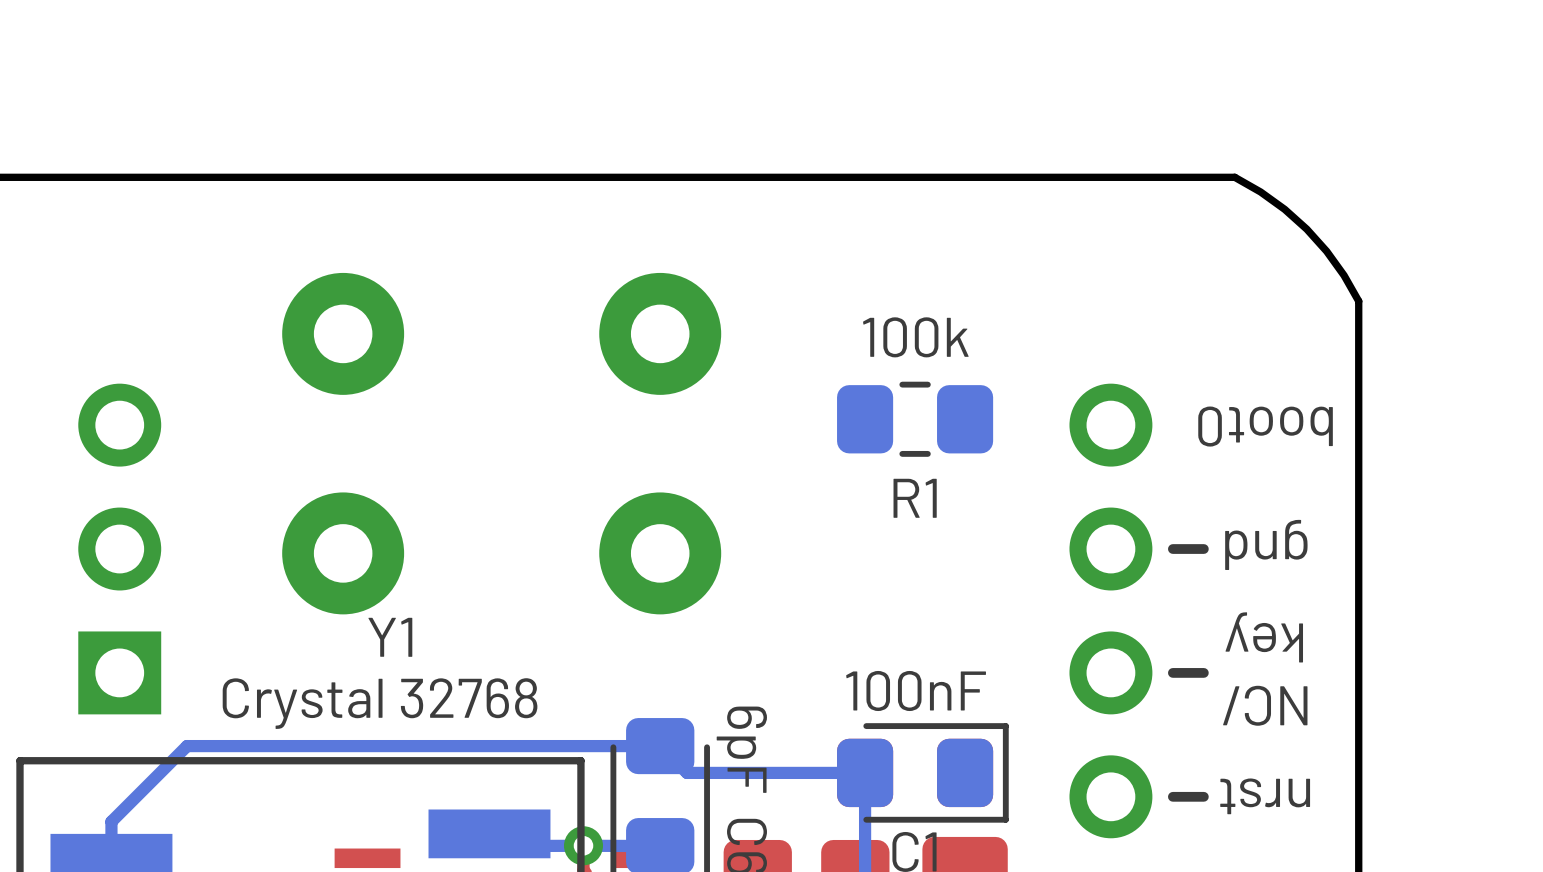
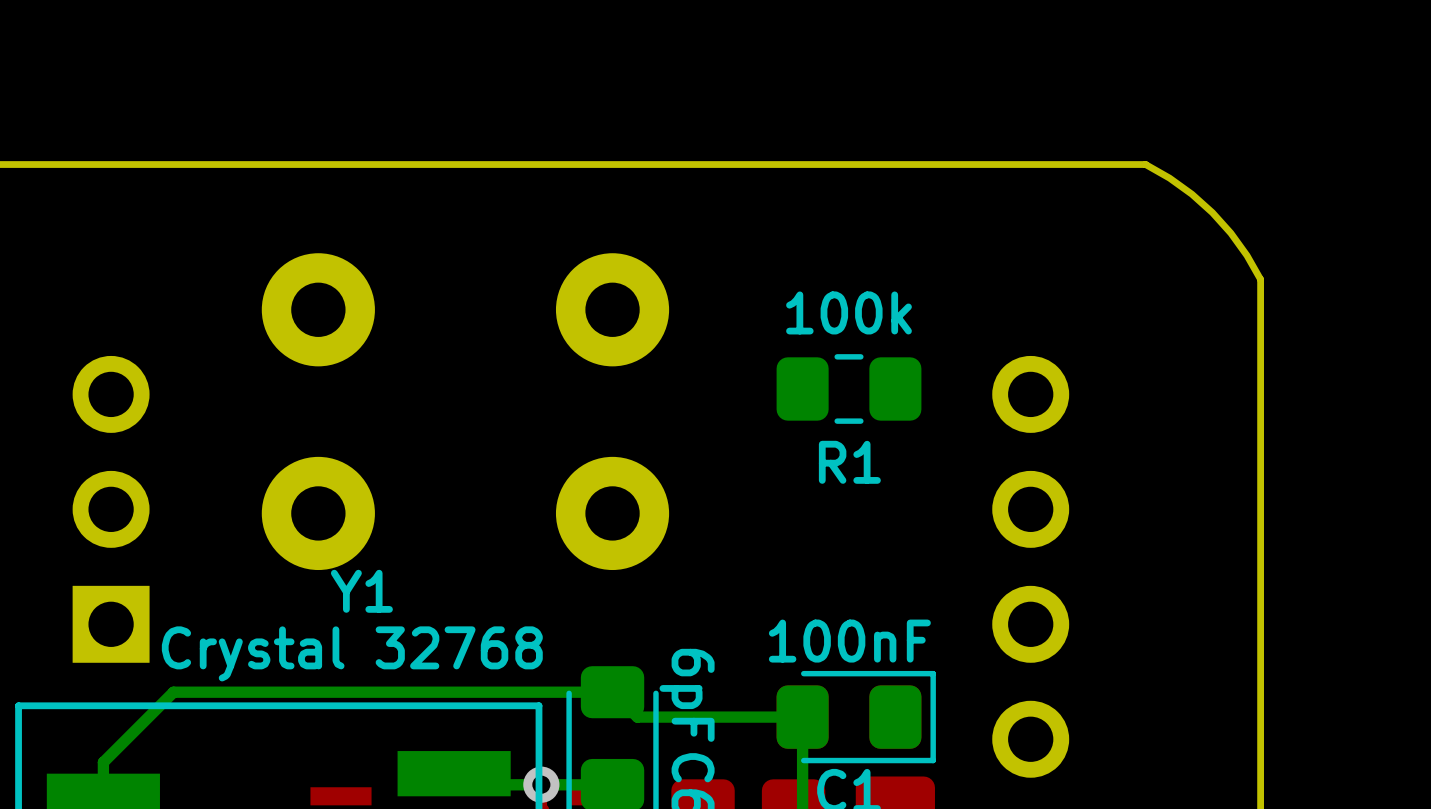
text: boot0 (1265, 426) -> none
text: gnd (1266, 544) -> none
line: (1203, 549) (1172, 549) -> none
text: key (1264, 637) -> none
line: (1203, 672) (1172, 672) -> none
text: NC/ (1265, 705) -> none
line: (1203, 796) (1172, 796) -> none
text: nrst (1265, 796) -> none

